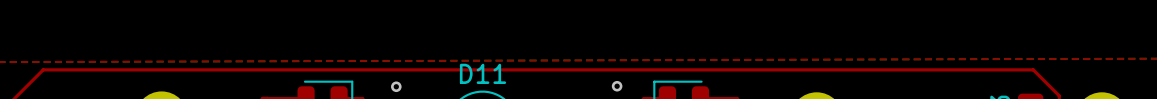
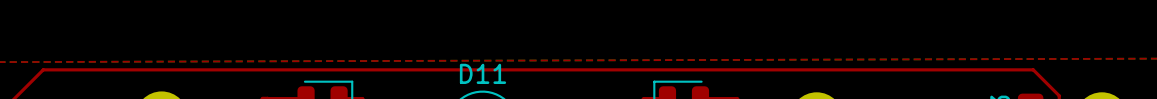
via: (396, 86) -> none
via: (617, 86) -> none

